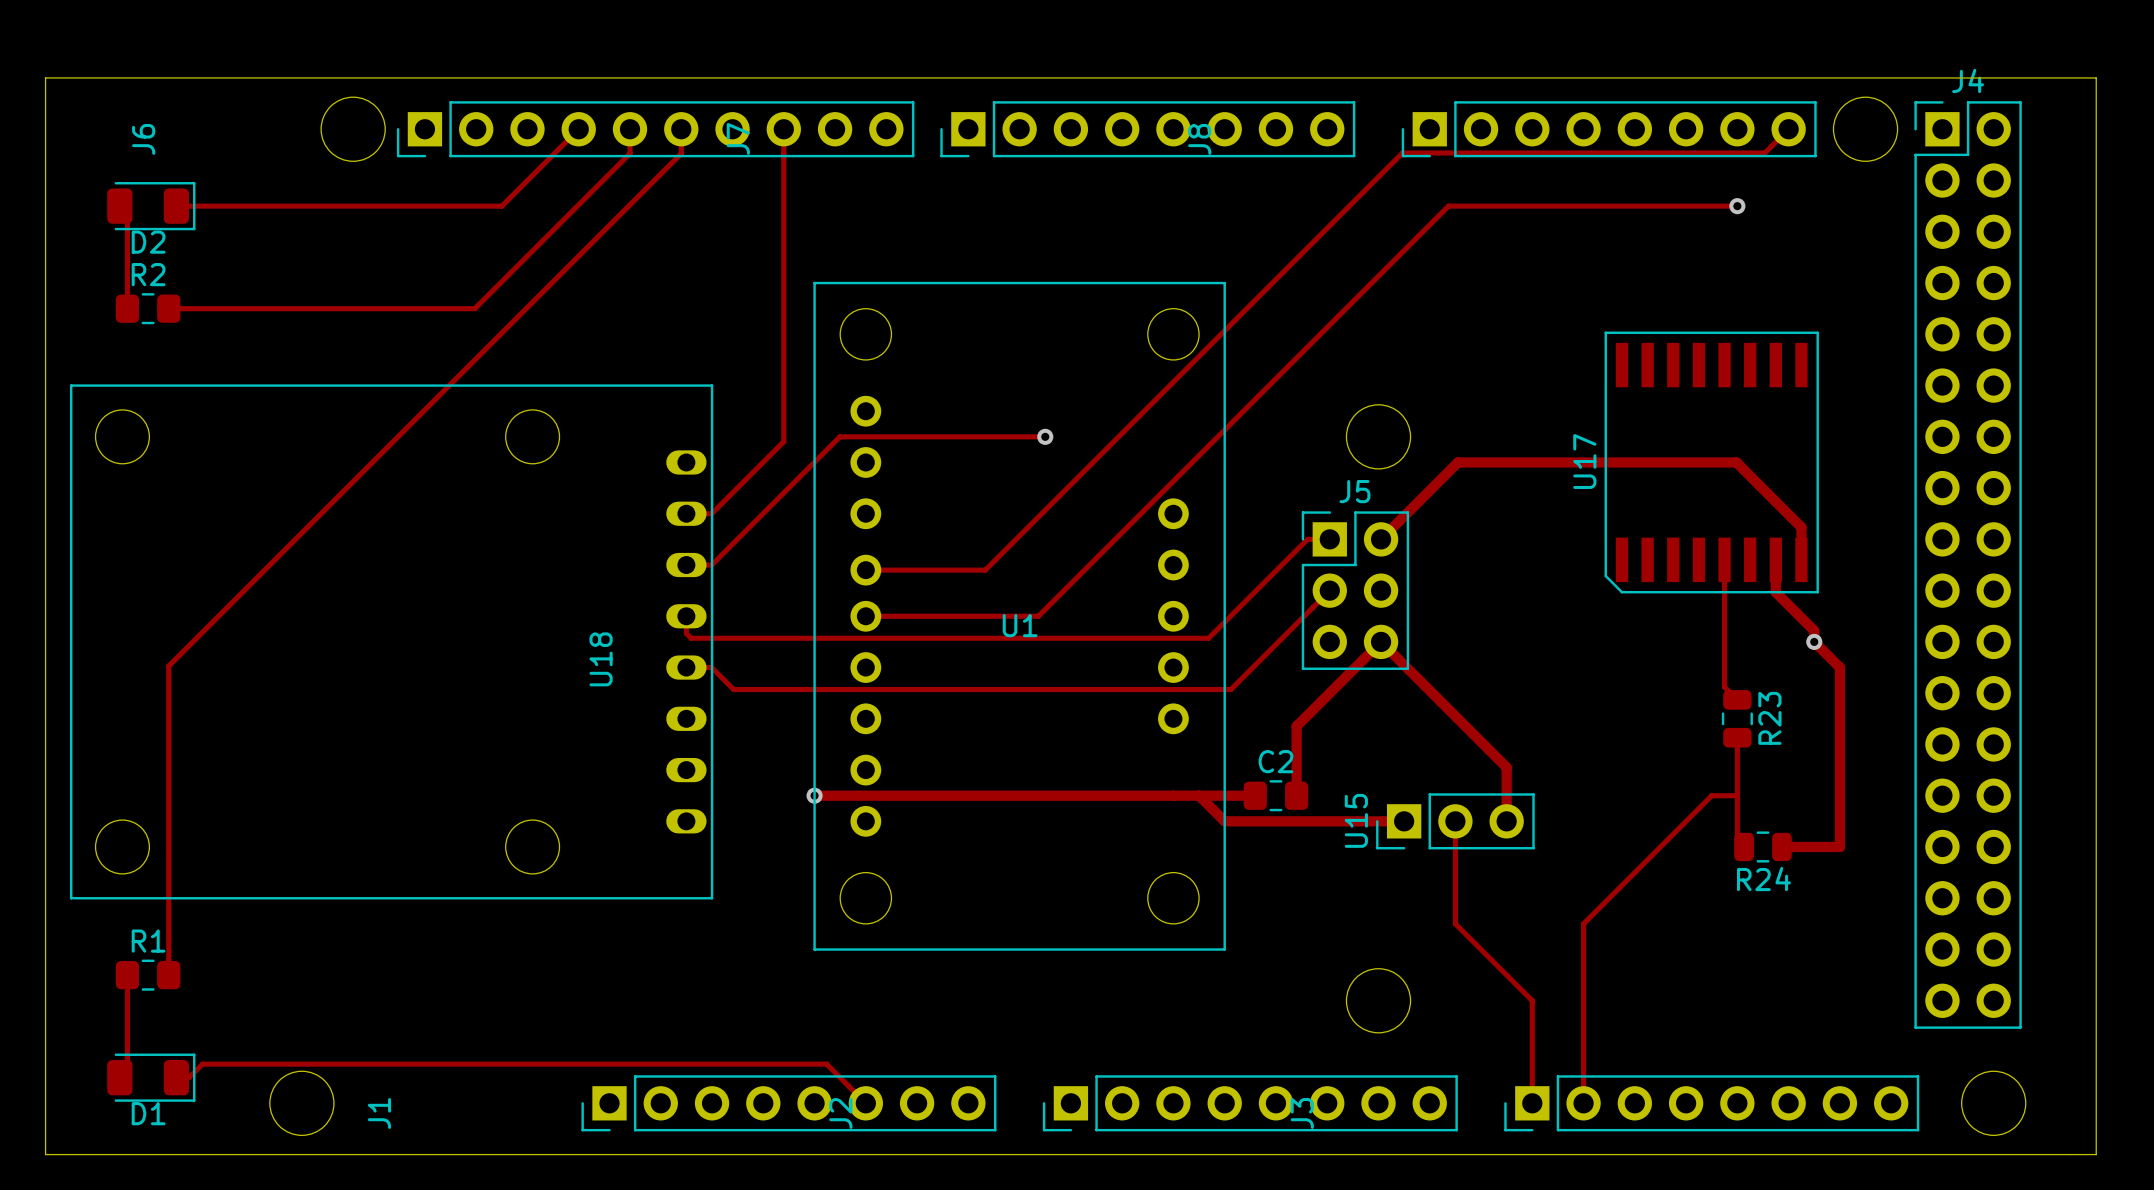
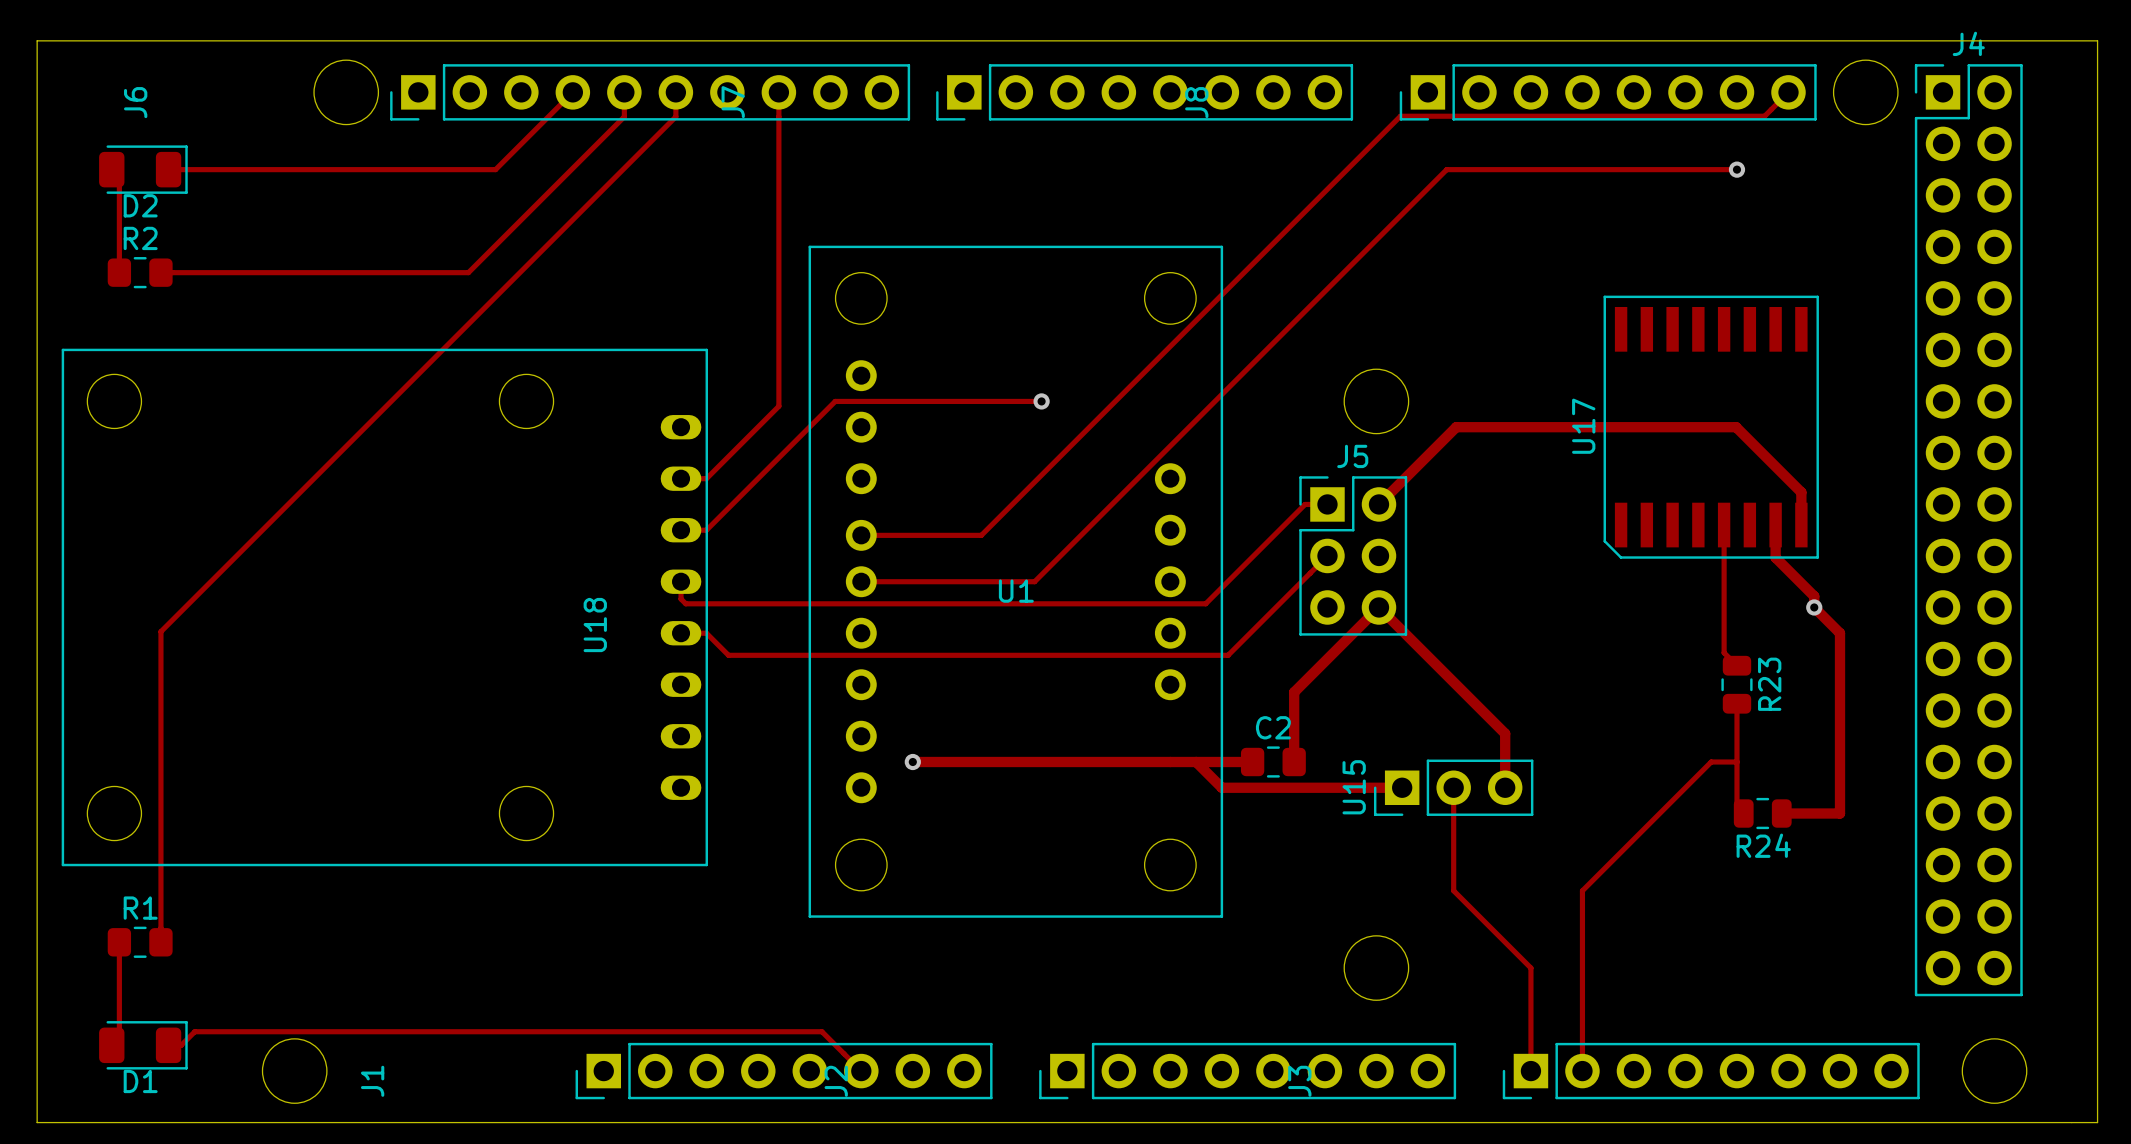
track: (814, 795) (917, 795) -> none
via position: (814, 795) -> (912, 762)

